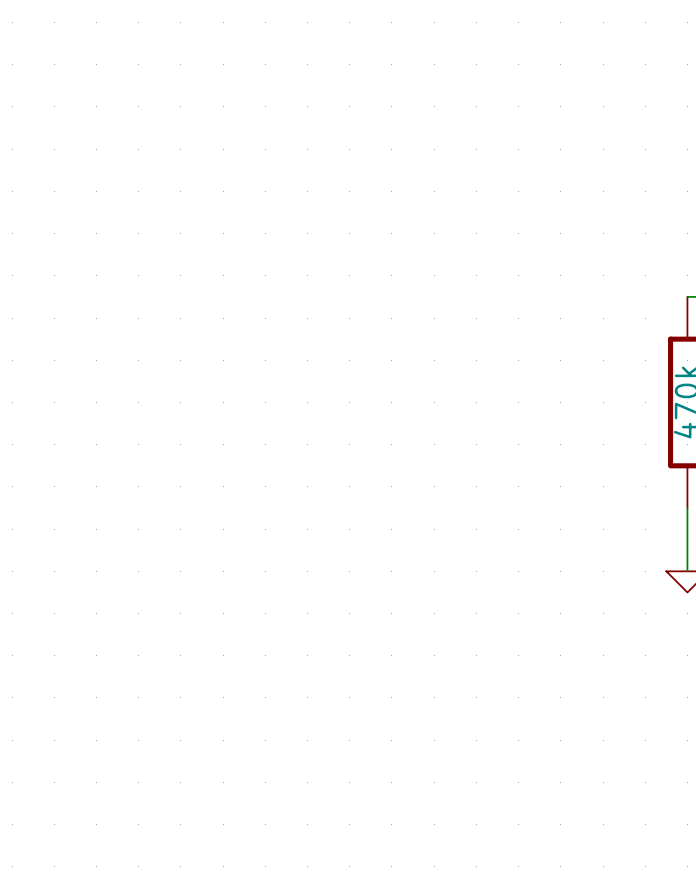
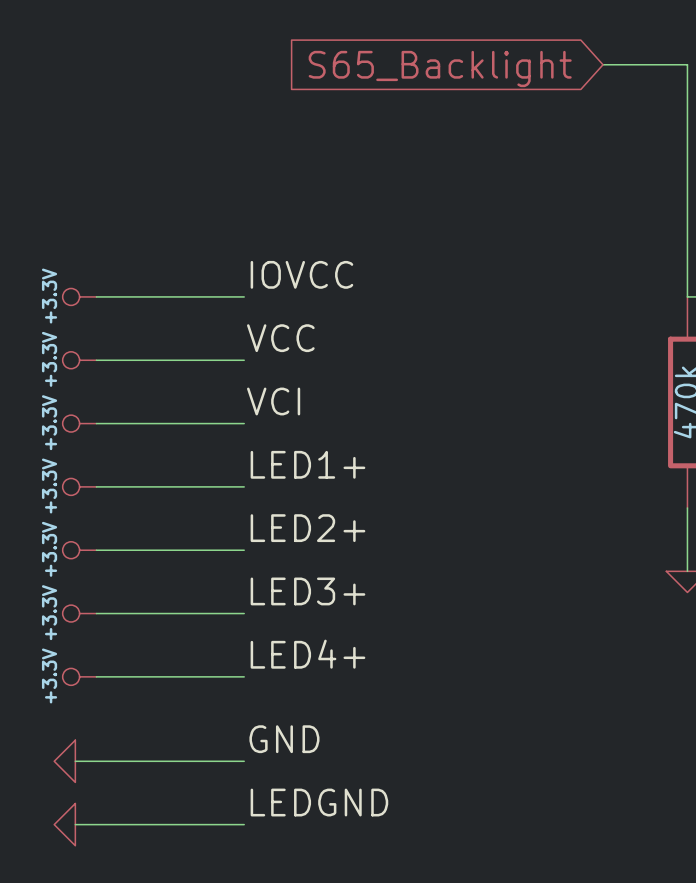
wire: none -> (603, 64) (687, 64) (687, 296)
global label: none -> S65_Backlight (440, 68)
label: none -> IOVCC (301, 274)
power symbol: none -> +3.3V (79, 296)
wire: none -> (96, 296) (244, 296)
label: none -> VCC (280, 338)
power symbol: none -> +3.3V (79, 360)
wire: none -> (96, 360) (244, 360)
label: none -> VCI (273, 401)
power symbol: none -> +3.3V (79, 423)
wire: none -> (96, 423) (244, 423)
label: none -> LED1+ (307, 464)
power symbol: none -> +3.3V (79, 486)
wire: none -> (96, 486) (244, 486)
label: none -> LED2+ (307, 528)
power symbol: none -> +3.3V (79, 550)
wire: none -> (96, 550) (244, 550)
label: none -> LED3+ (307, 591)
power symbol: none -> +3.3V (79, 613)
wire: none -> (96, 613) (244, 613)
label: none -> LED4+ (307, 654)
power symbol: none -> +3.3V (79, 676)
wire: none -> (96, 676) (244, 676)
label: none -> GND (284, 739)
power symbol: none -> (64, 761)
wire: none -> (75, 761) (244, 761)
label: none -> LEDGND (319, 802)
power symbol: none -> (64, 824)
wire: none -> (75, 824) (244, 824)

